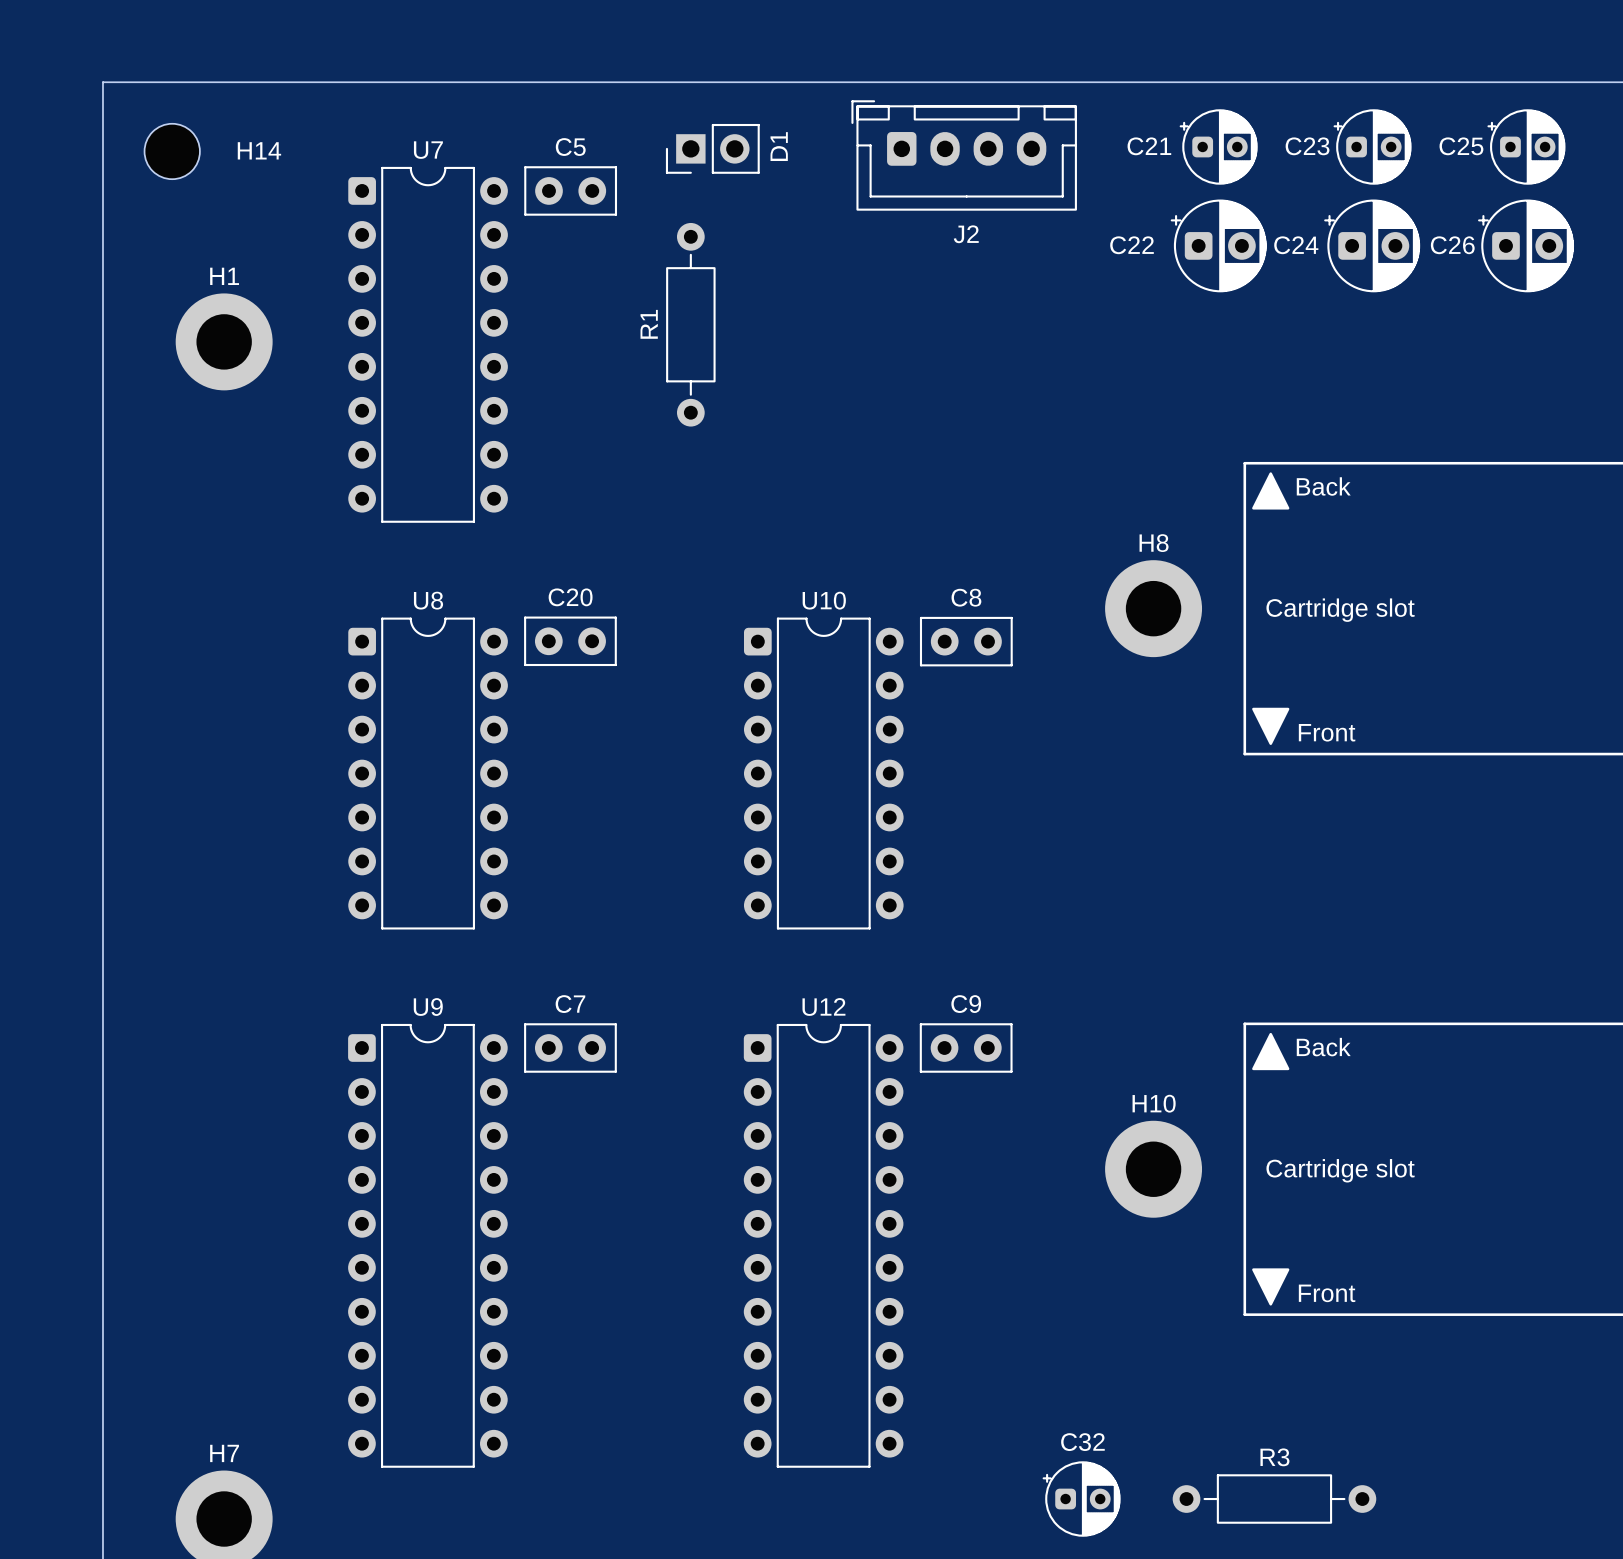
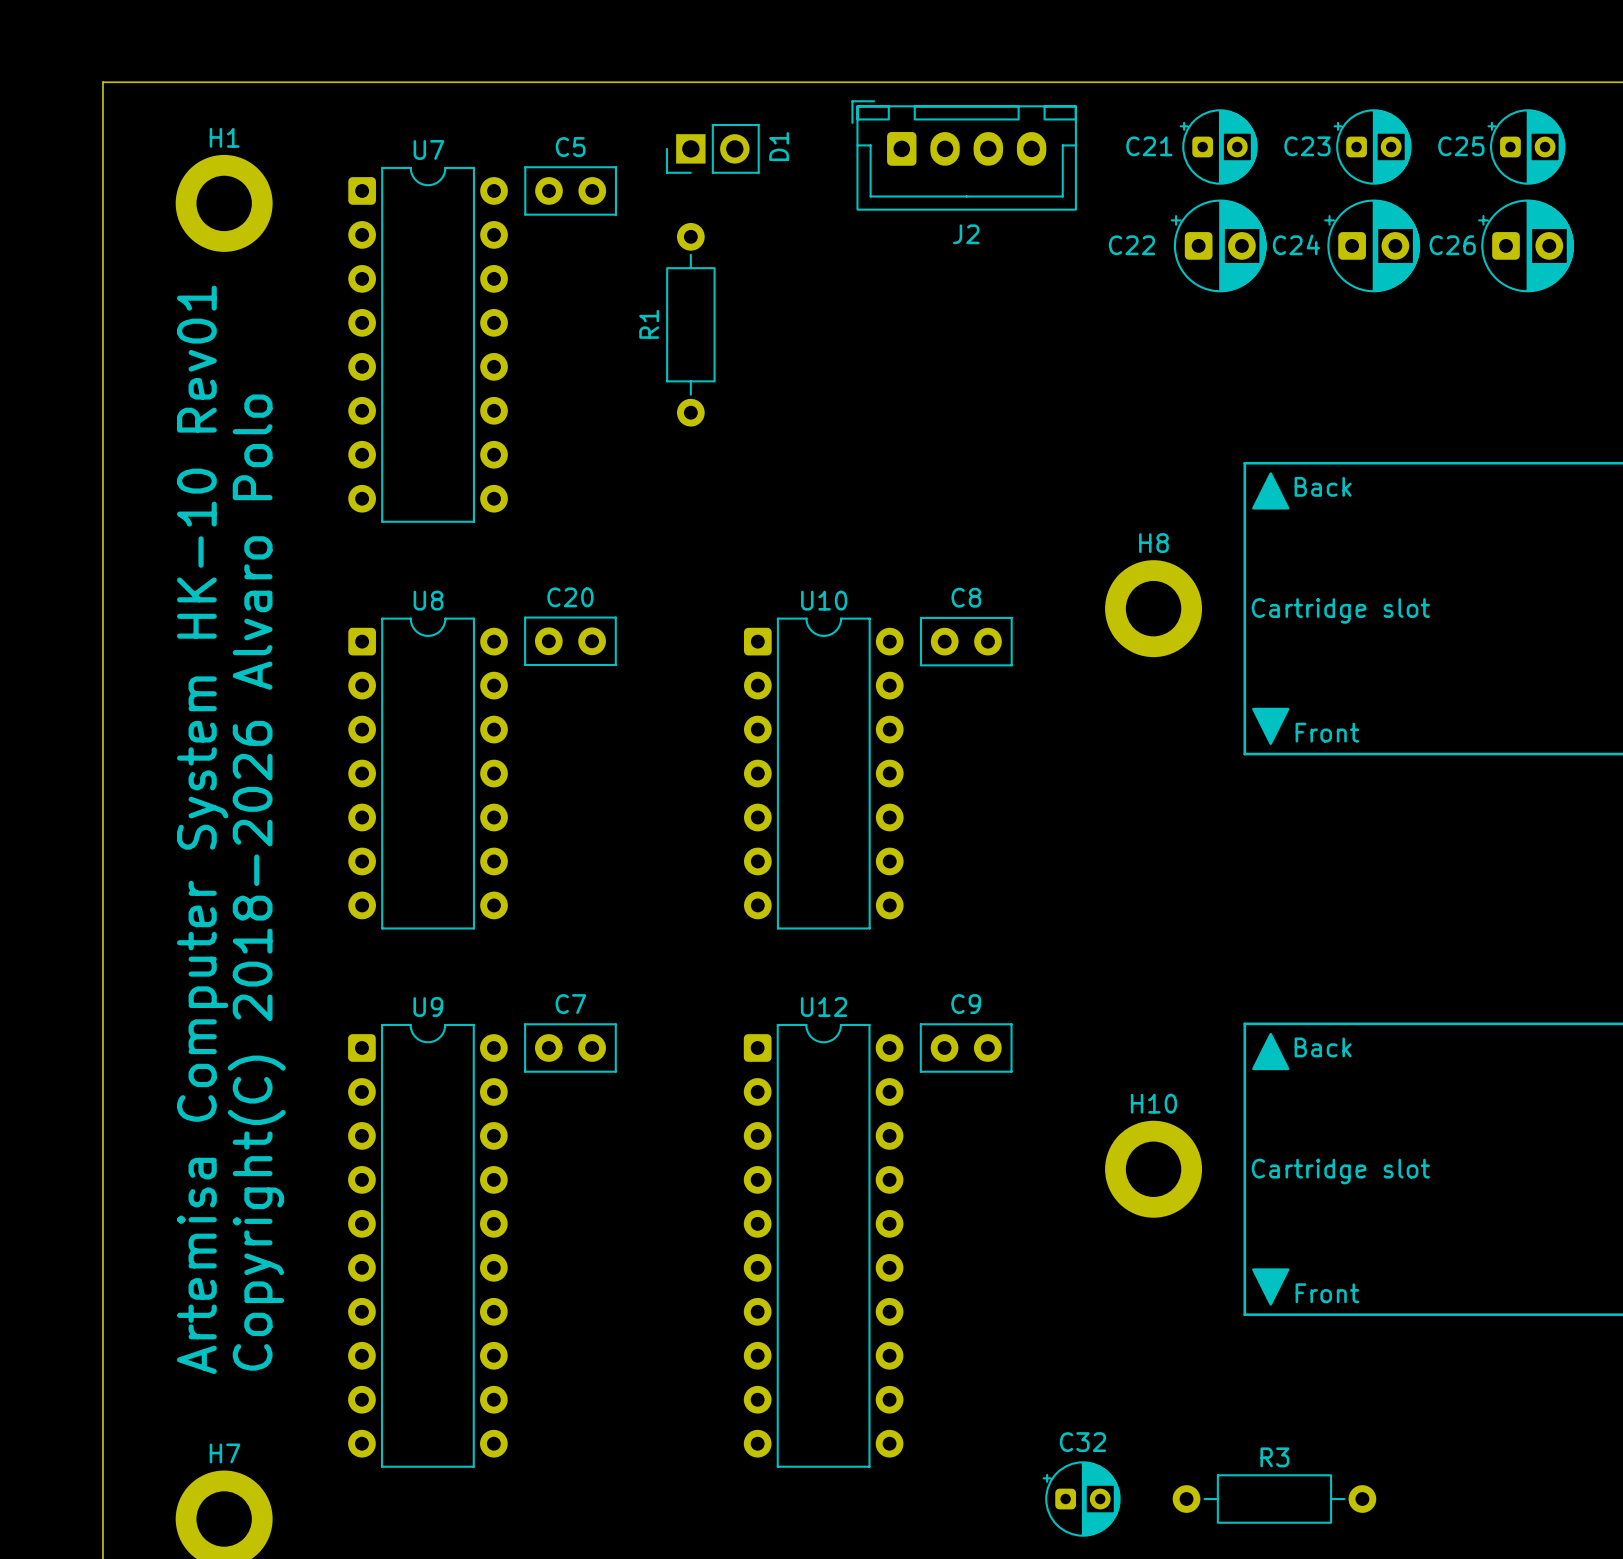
H14: (172, 151) -> none
H1 position: (224, 341) -> (224, 203)
text: none -> Artemisa Computer System HK-10 Rev01 (202, 829)
text: none -> Copyright(C) 2018-2026 Alvaro Polo (256, 882)

